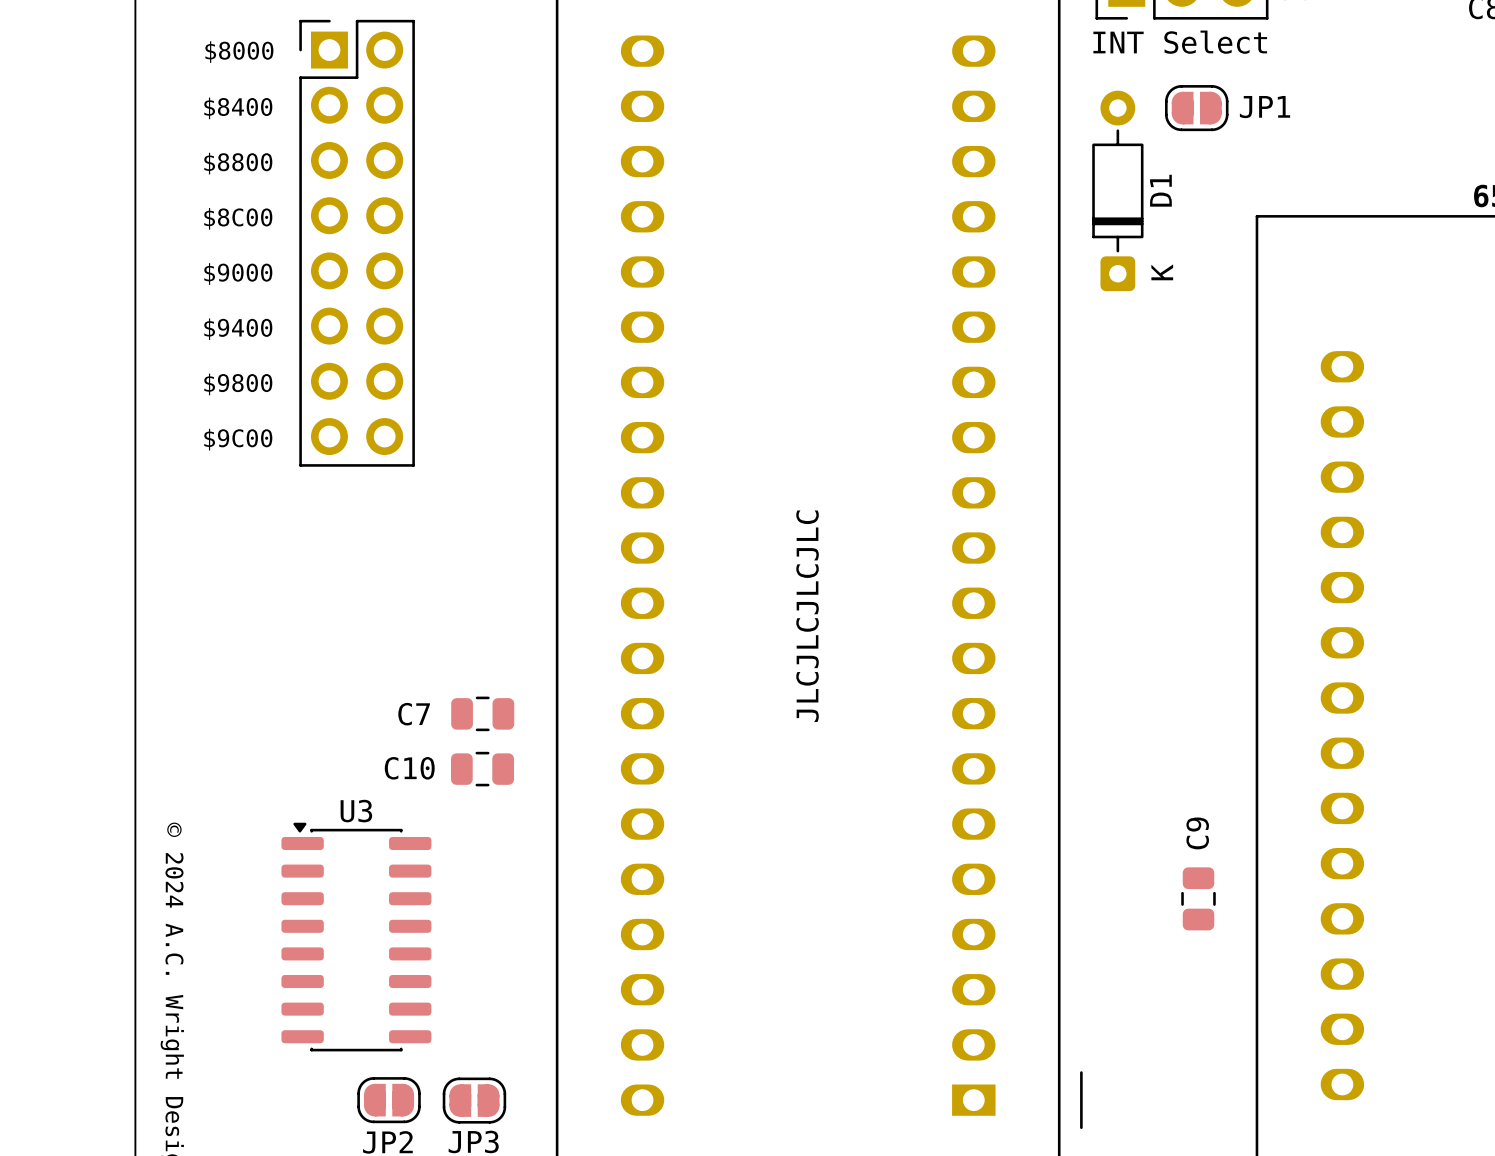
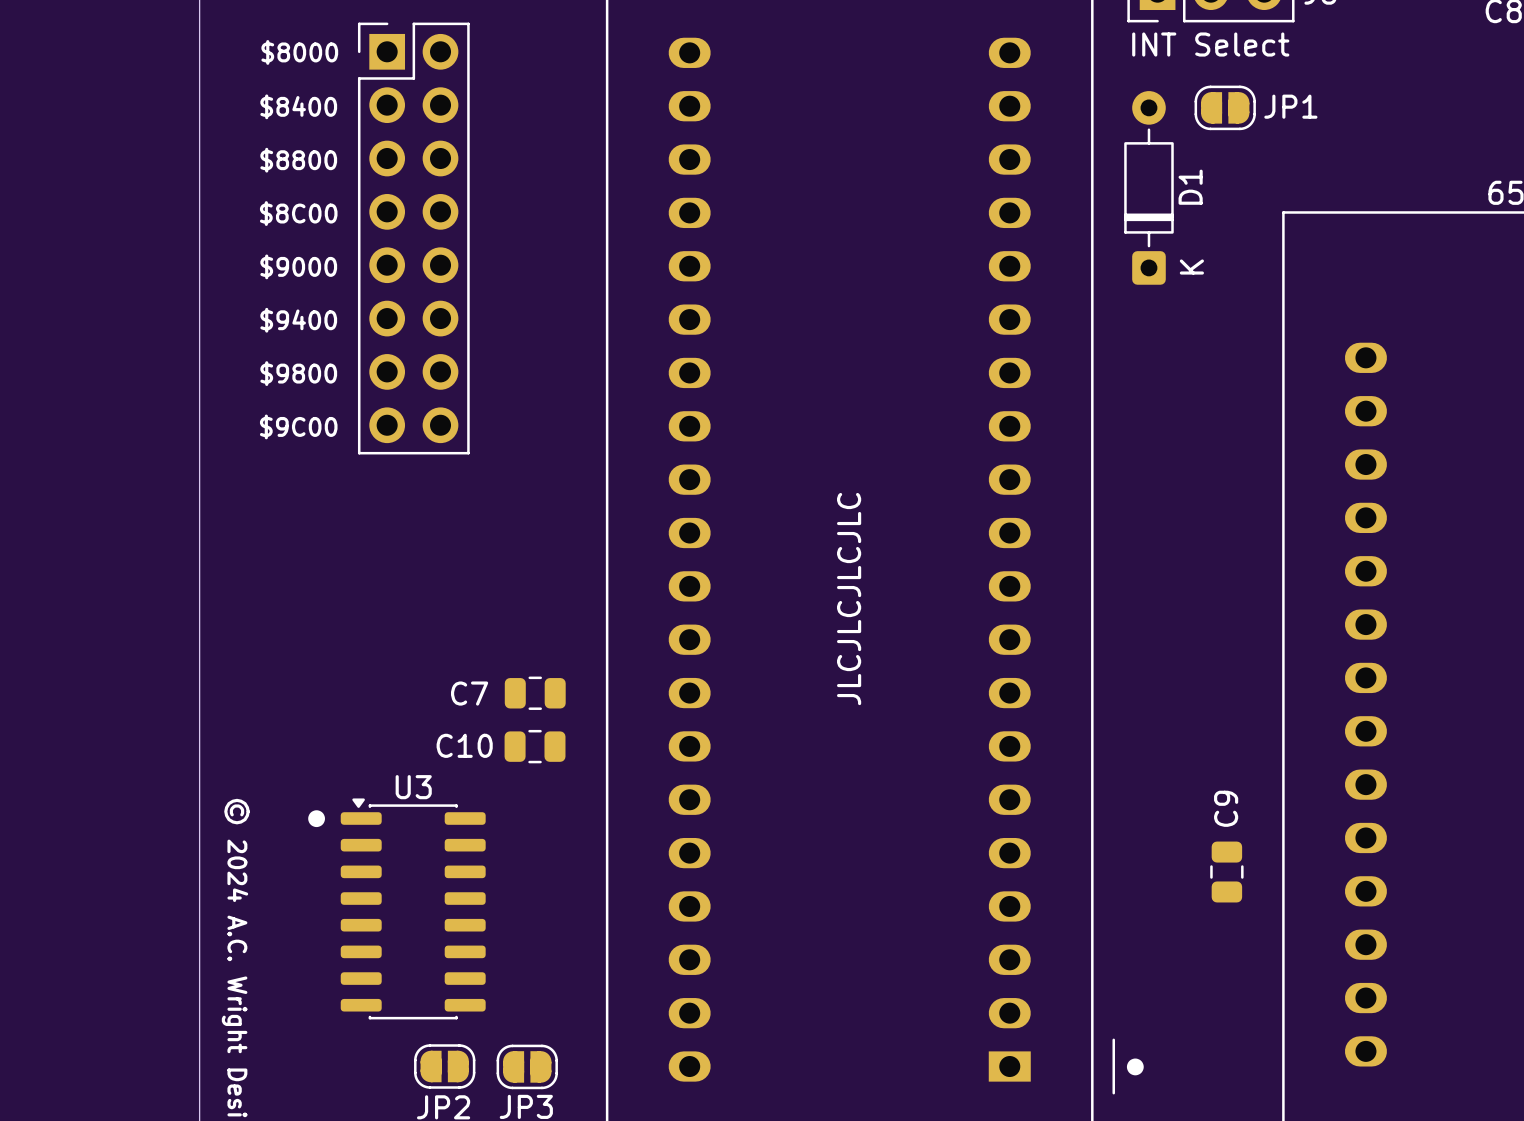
drawing: none -> [308, 810, 325, 828]
drawing: none -> [1126, 1058, 1144, 1076]

